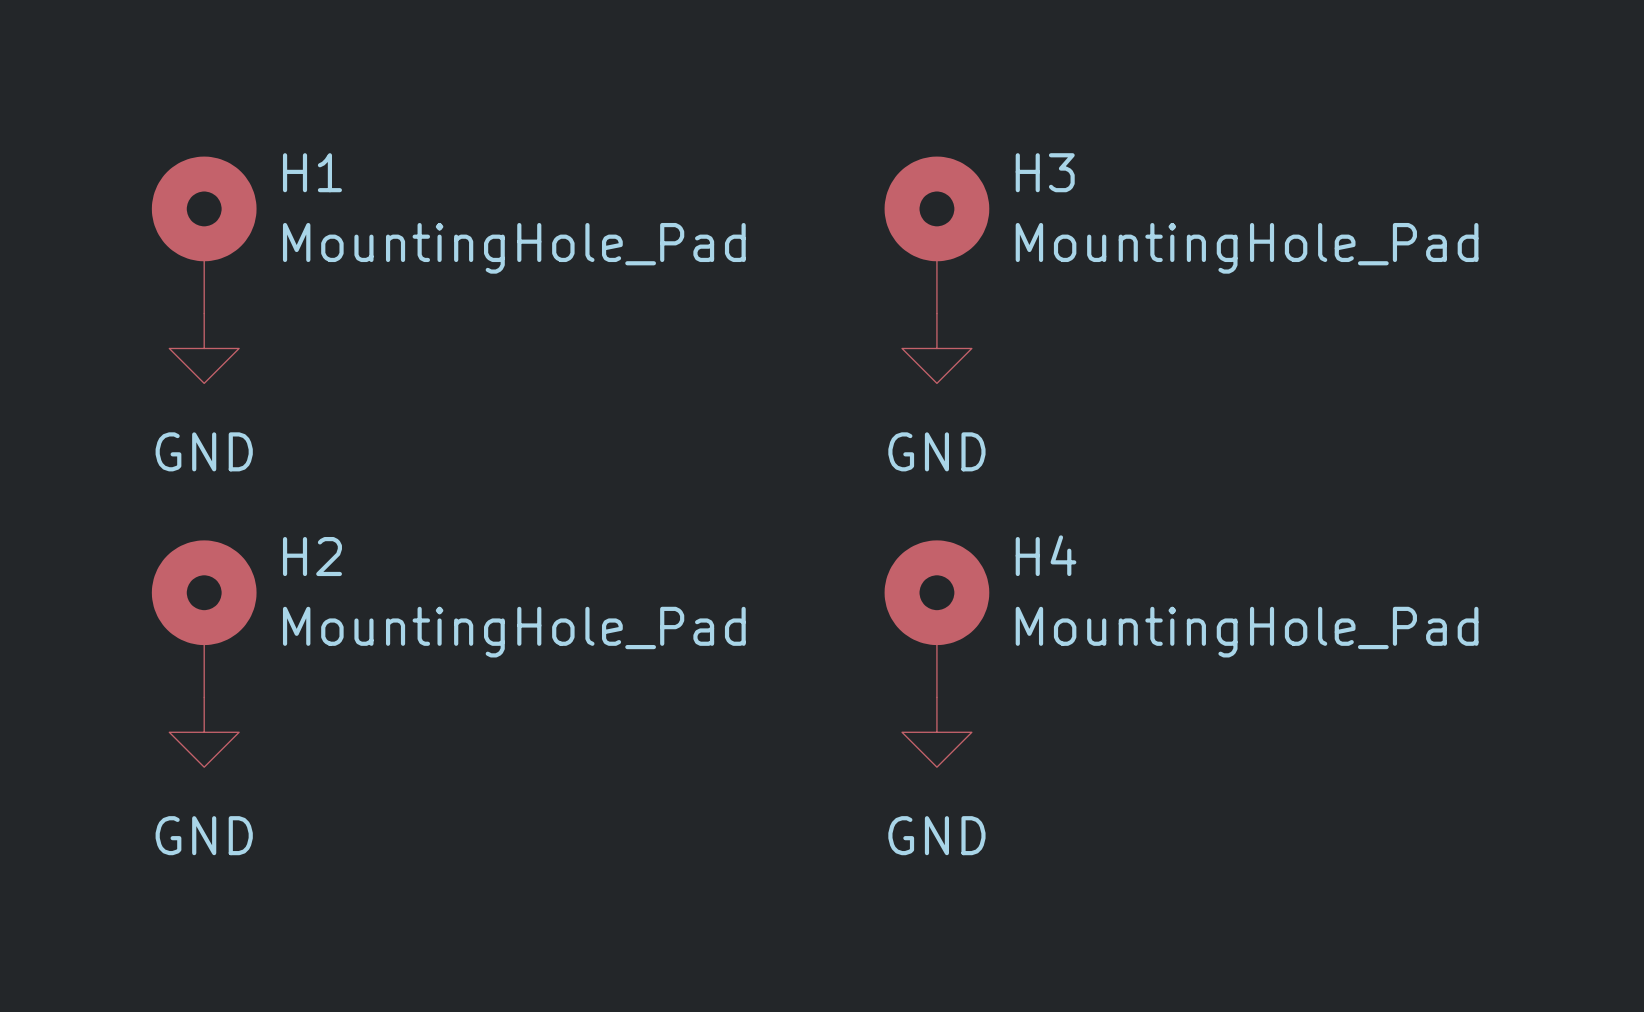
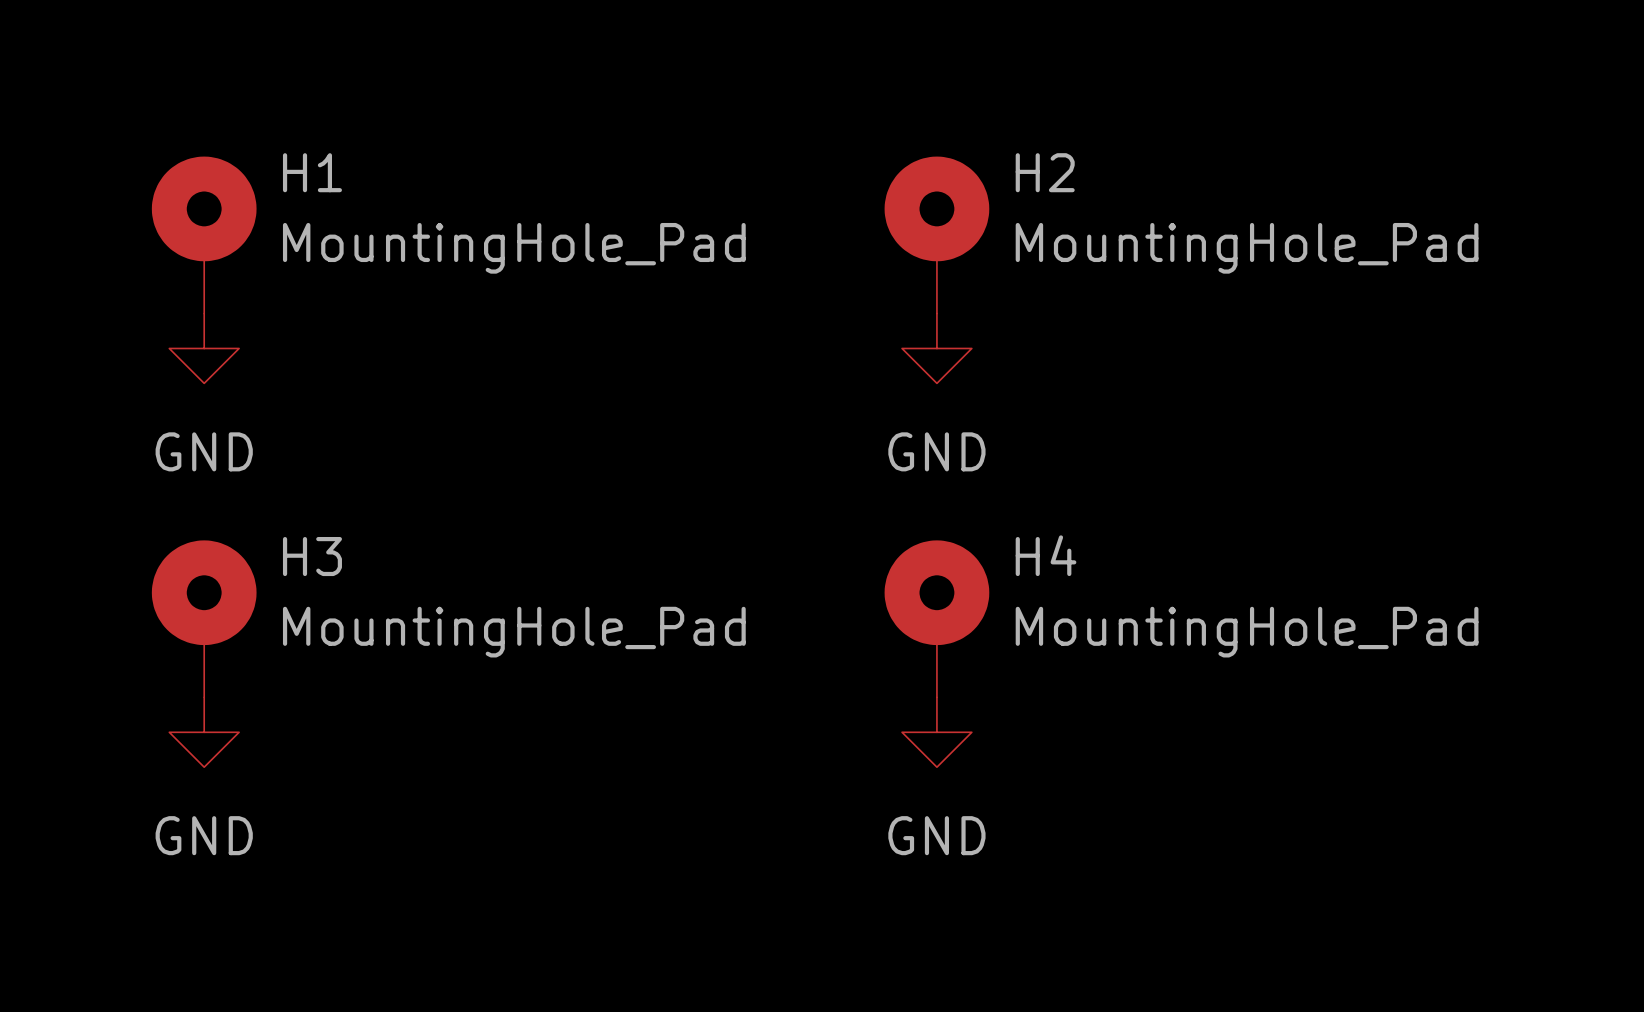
H3 name: H3 (1045, 172) -> H2 (1045, 172)
H2 name: H2 (312, 556) -> H3 (312, 556)

